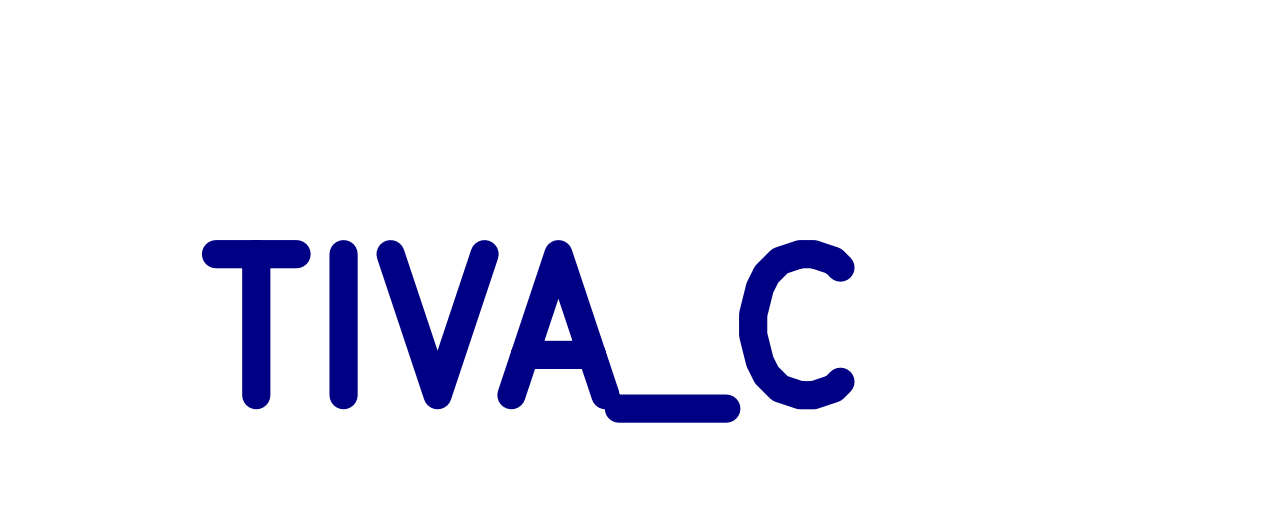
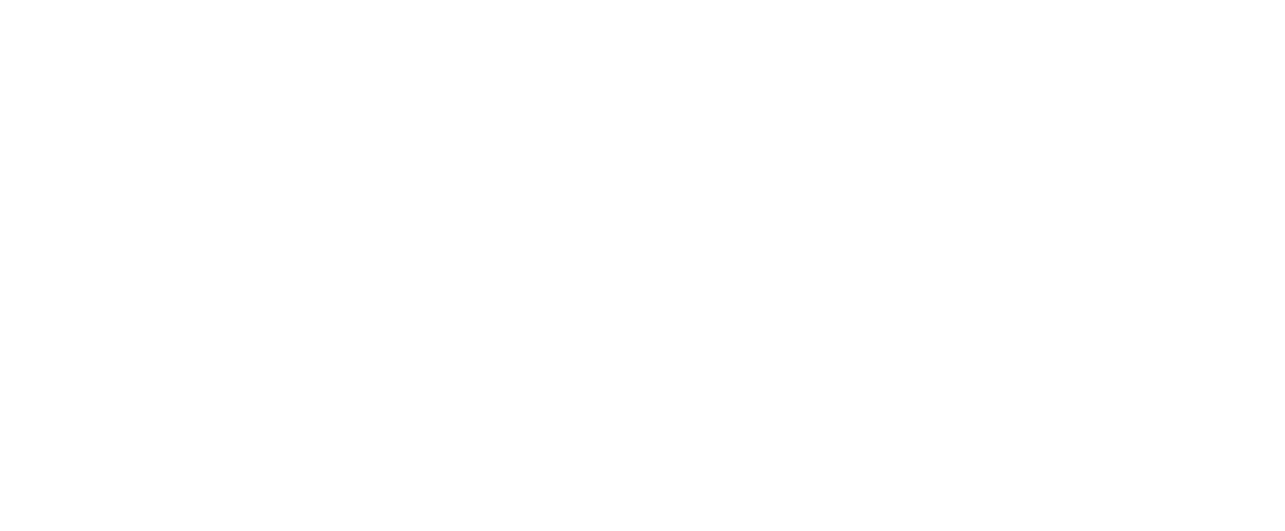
text: TIVA_C (528, 331) -> none

